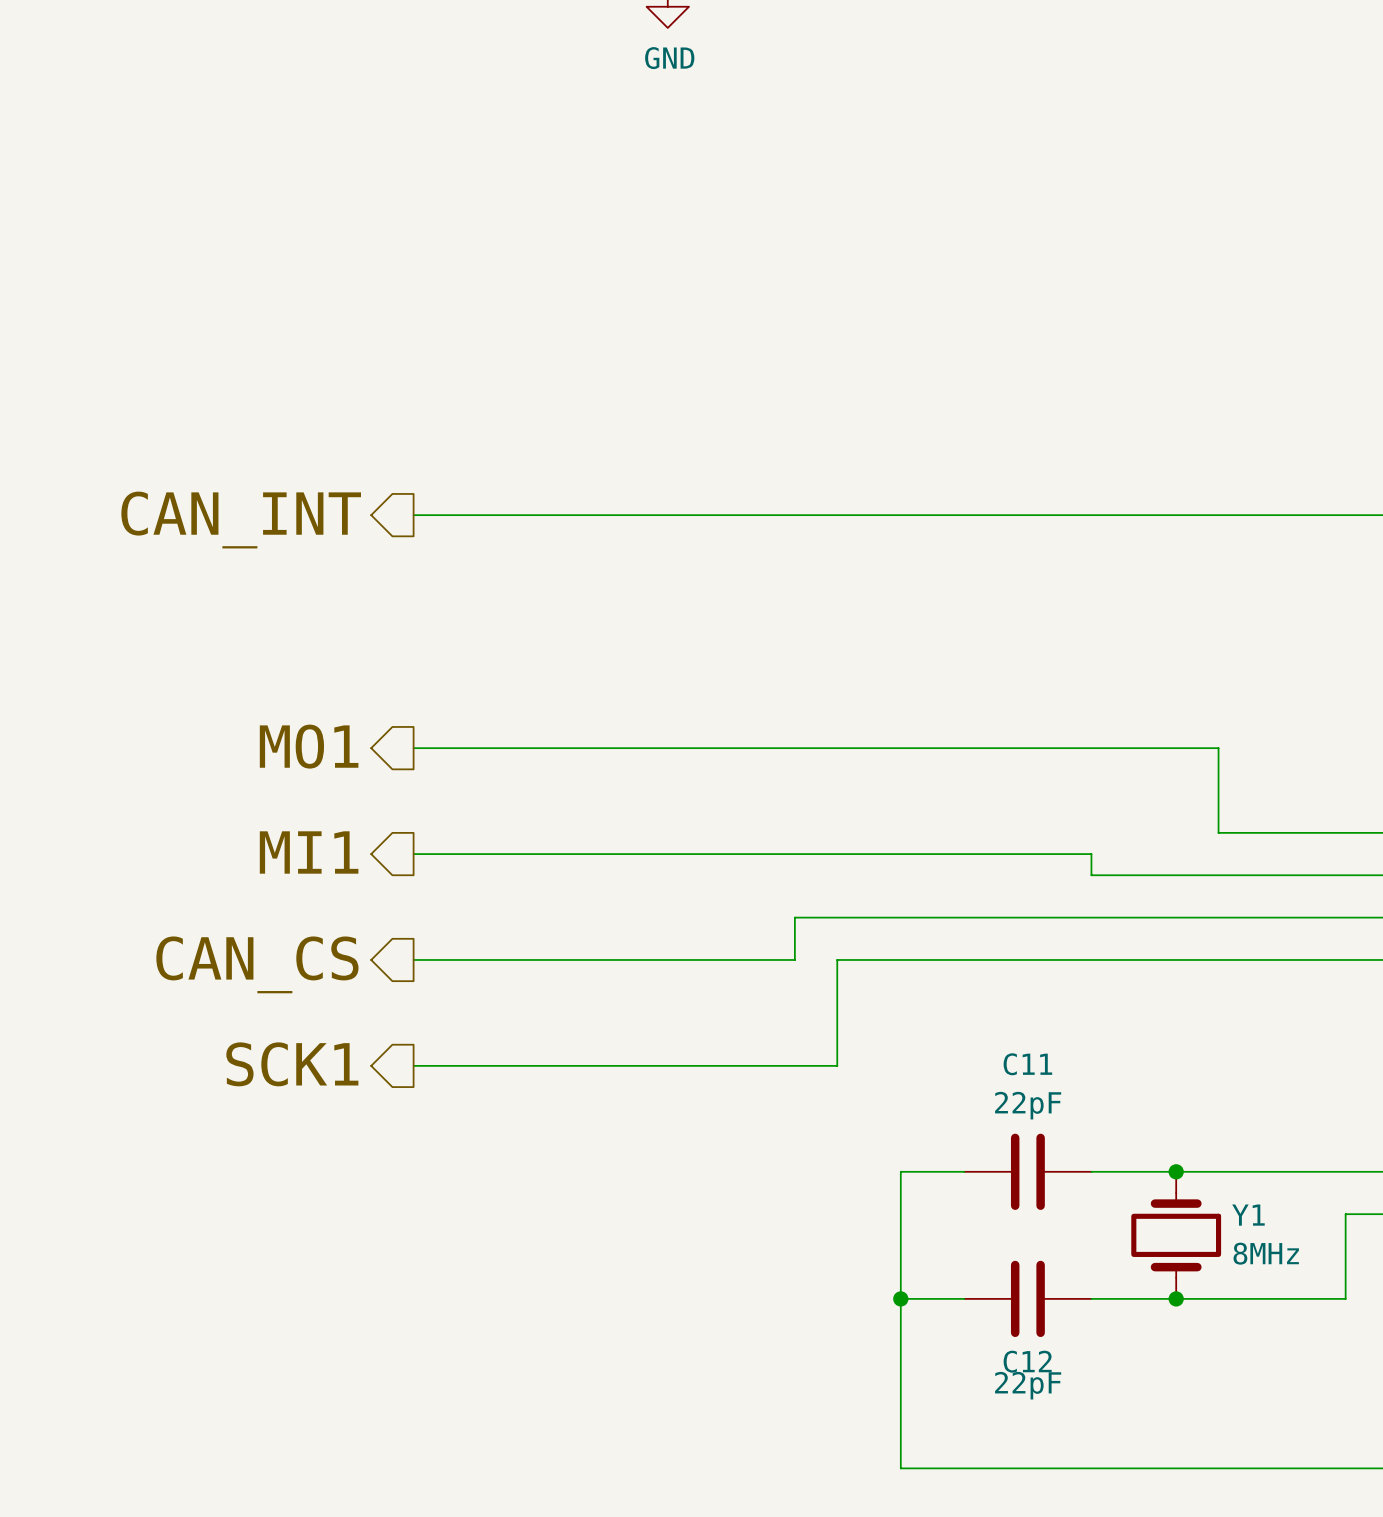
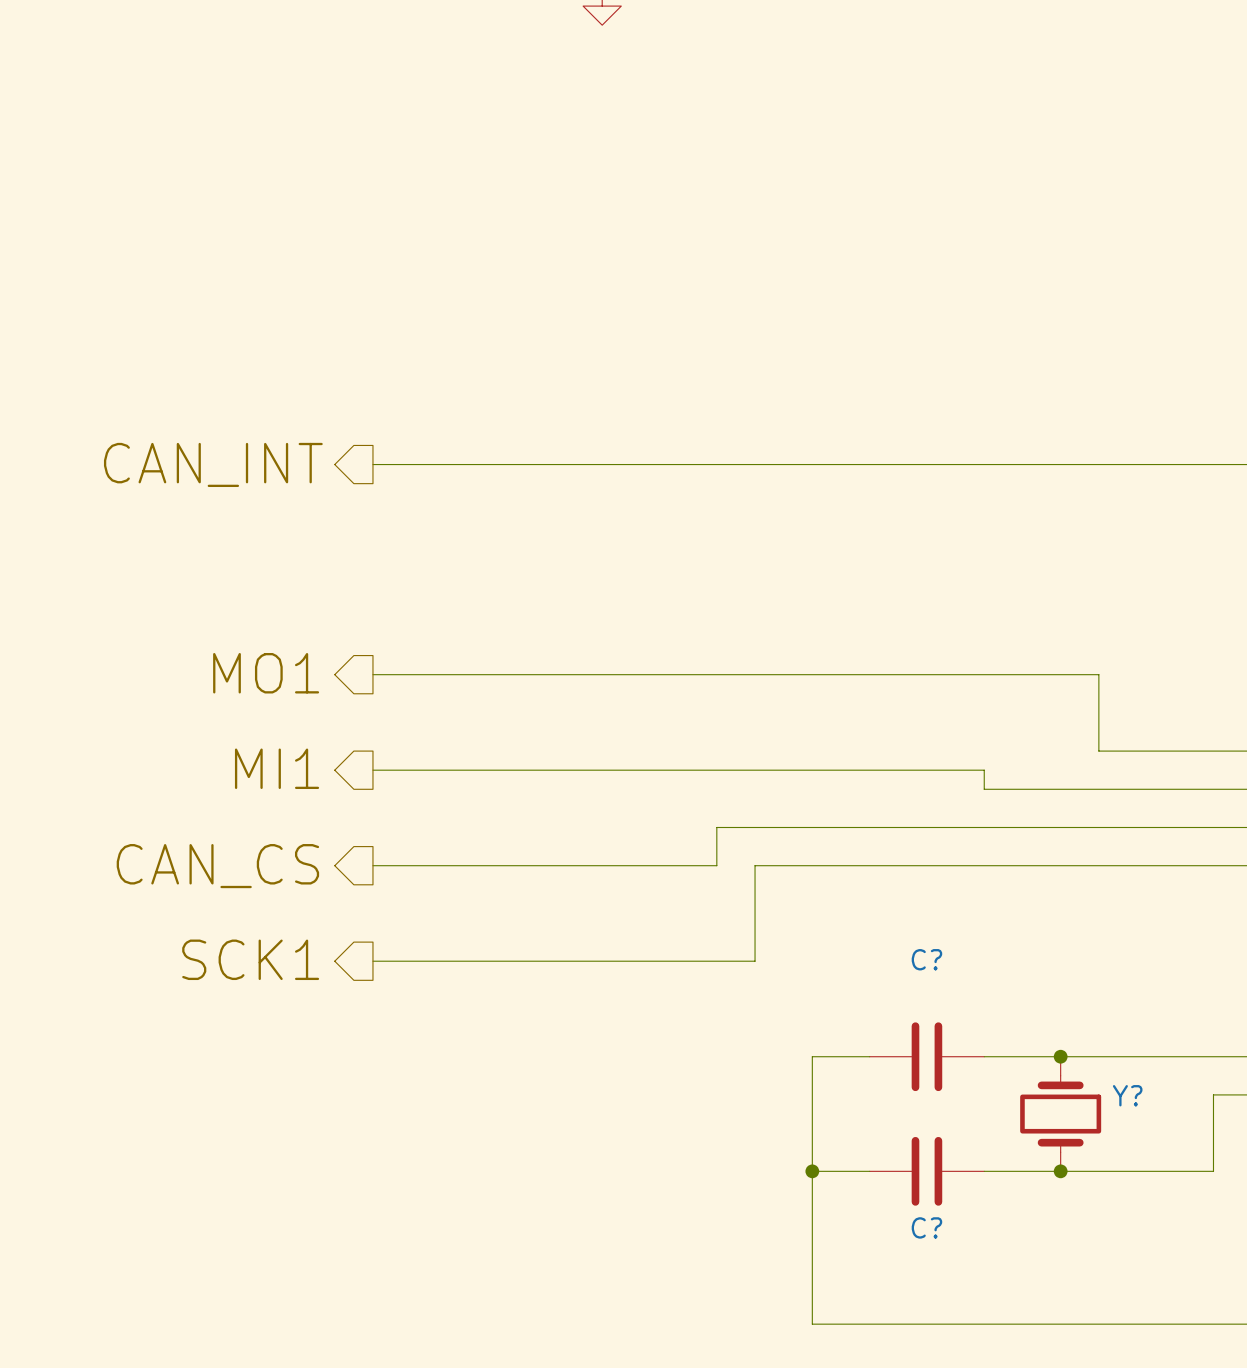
power symbol text: GND (669, 58) -> none
C11 name: C11 (1027, 1064) -> C? (926, 959)
C11 value: 22pF (1028, 1105) -> none
Y1 name: Y1 (1248, 1215) -> Y? (1127, 1095)
Y1 value: 8MHz (1266, 1253) -> none
C12 name: C12 (1027, 1361) -> C? (926, 1227)
C12 value: 22pF (1028, 1385) -> none

